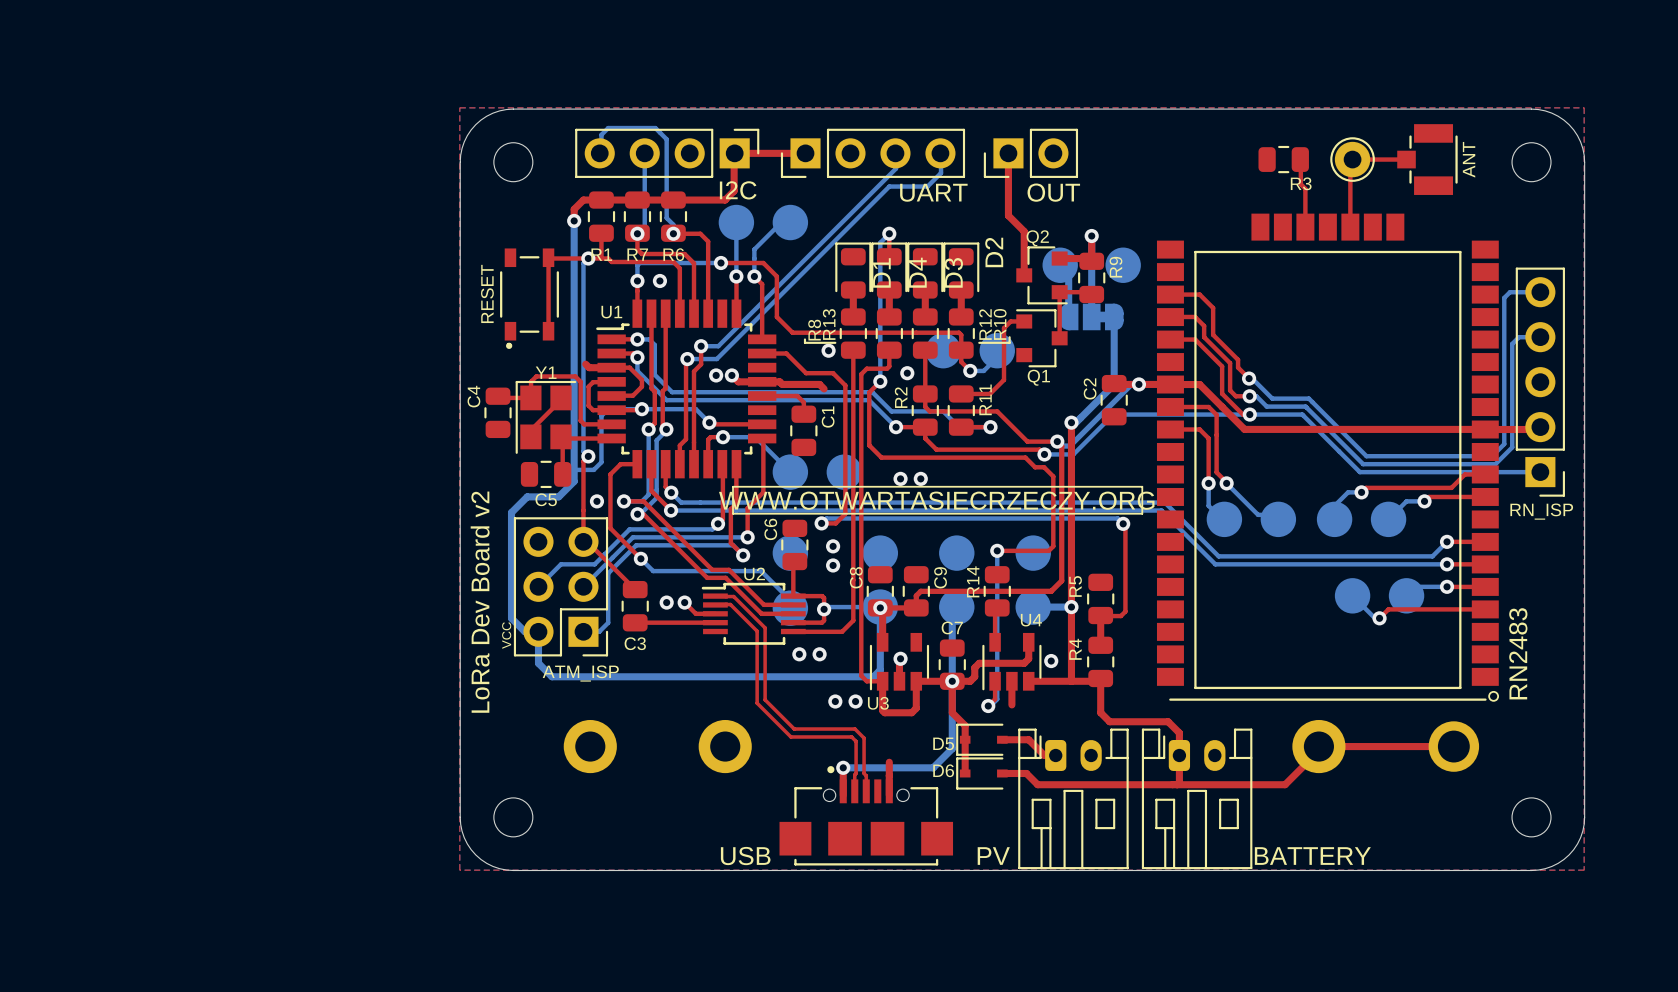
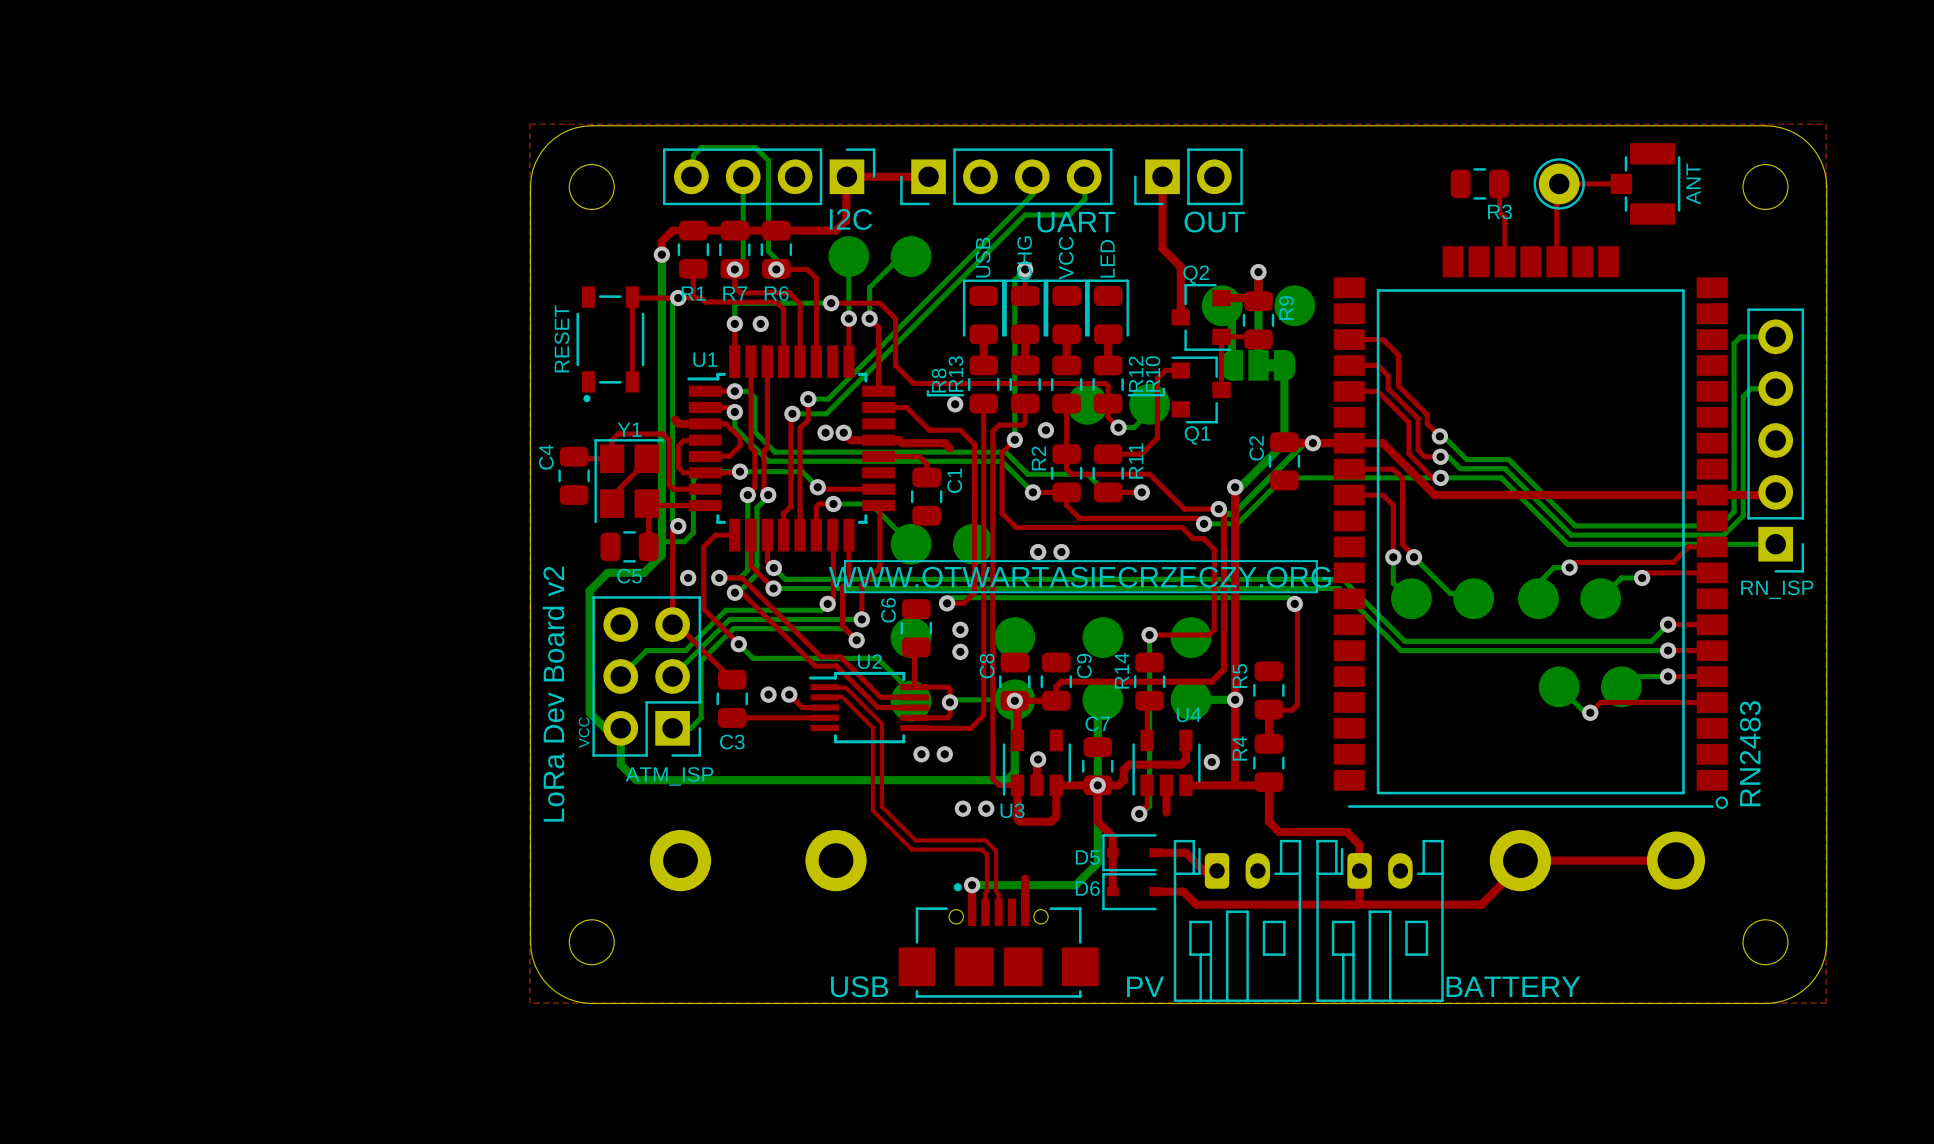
D2 name: D2 (994, 252) -> LED (1107, 258)
D1 name: D1 (881, 272) -> USB (983, 257)
D4 name: D4 (917, 272) -> CHG (1024, 258)
D3 name: D3 (953, 272) -> VCC (1066, 258)

